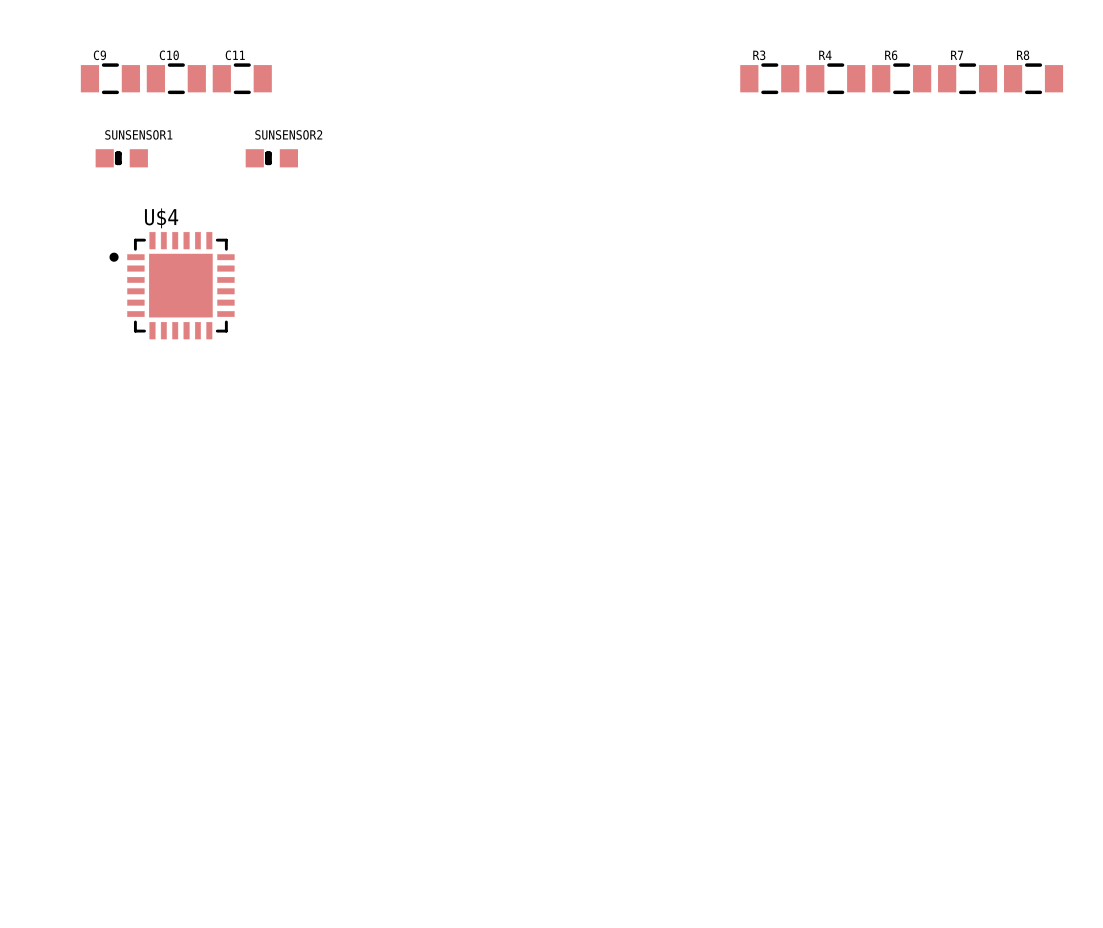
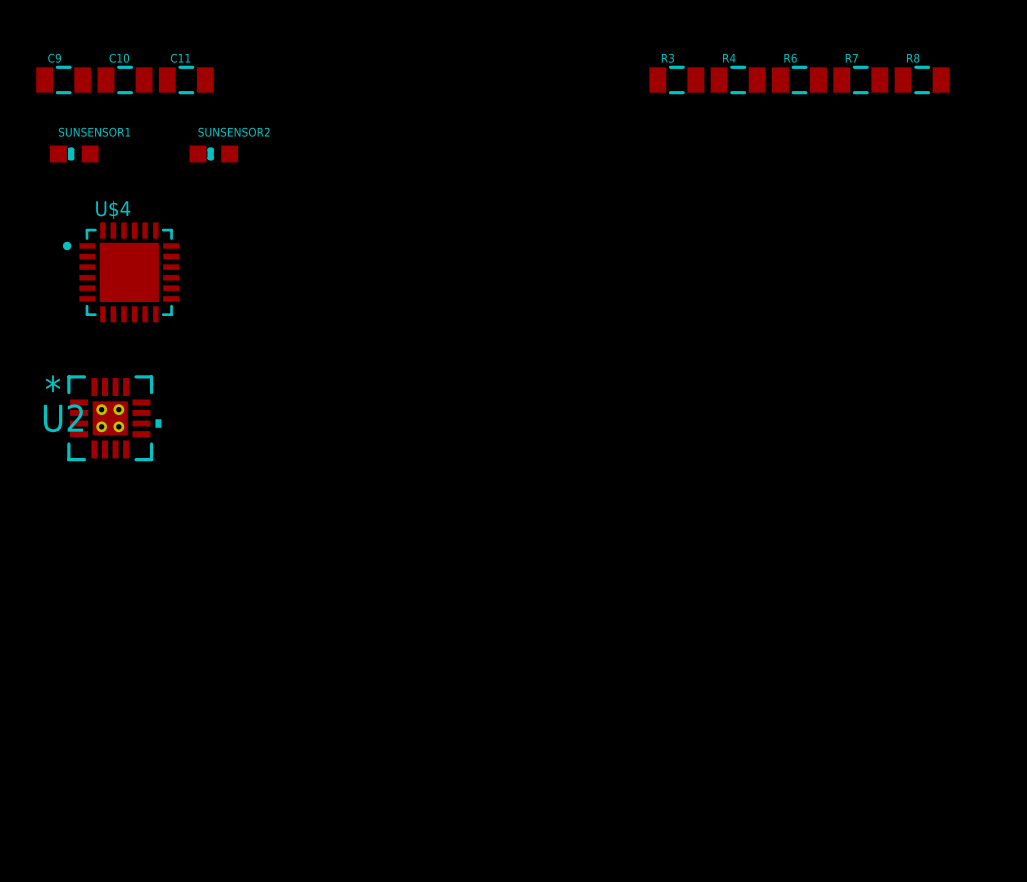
U2: none -> (114, 418)

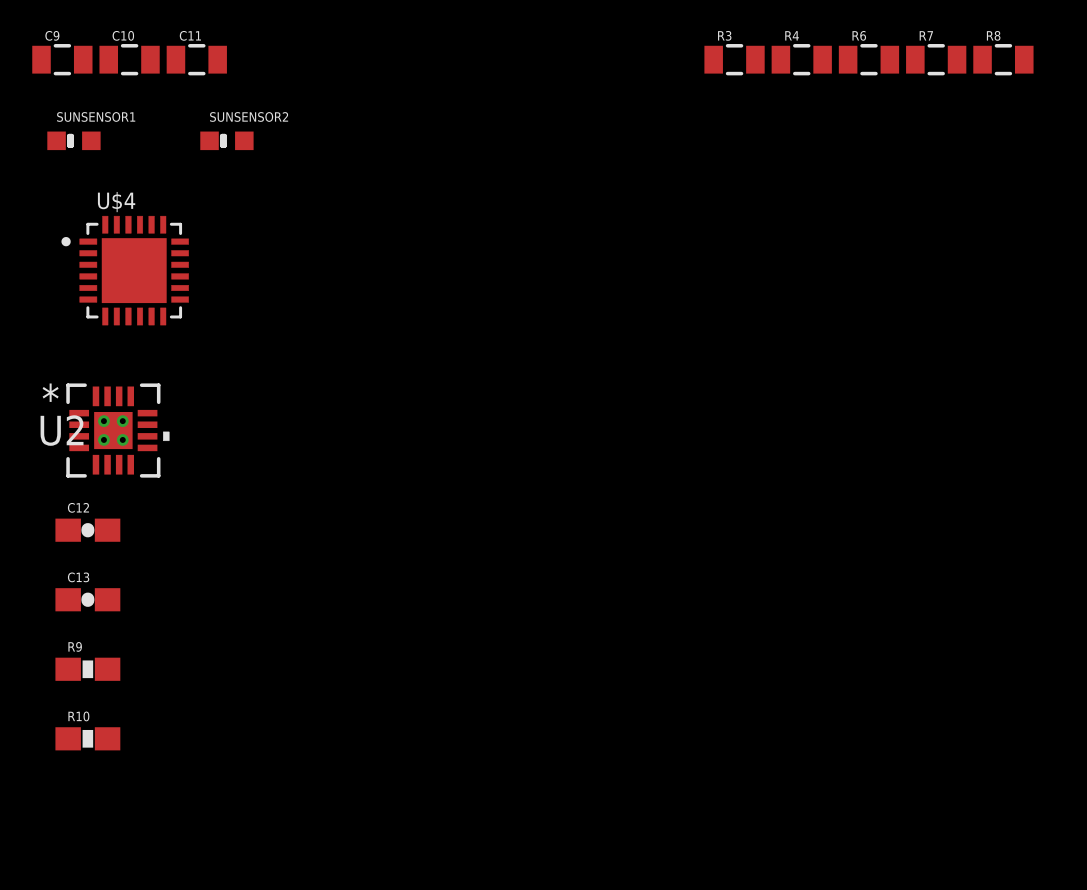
C12: none -> (87, 530)
C13: none -> (87, 599)
R9: none -> (87, 669)
R10: none -> (87, 738)

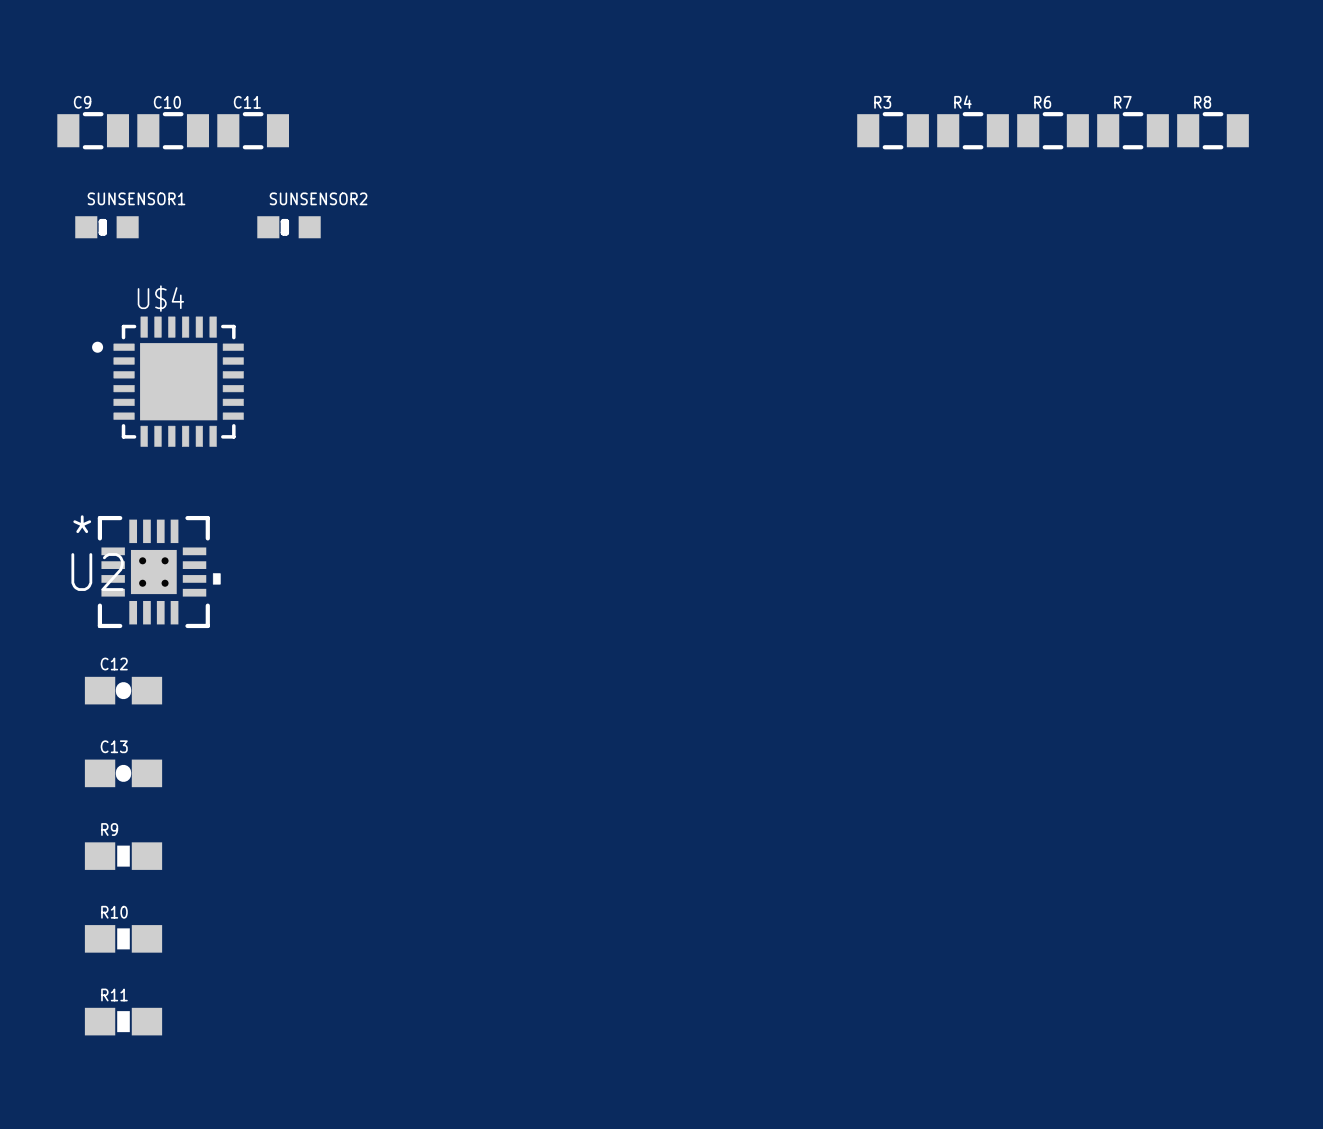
R11: none -> (123, 1021)

